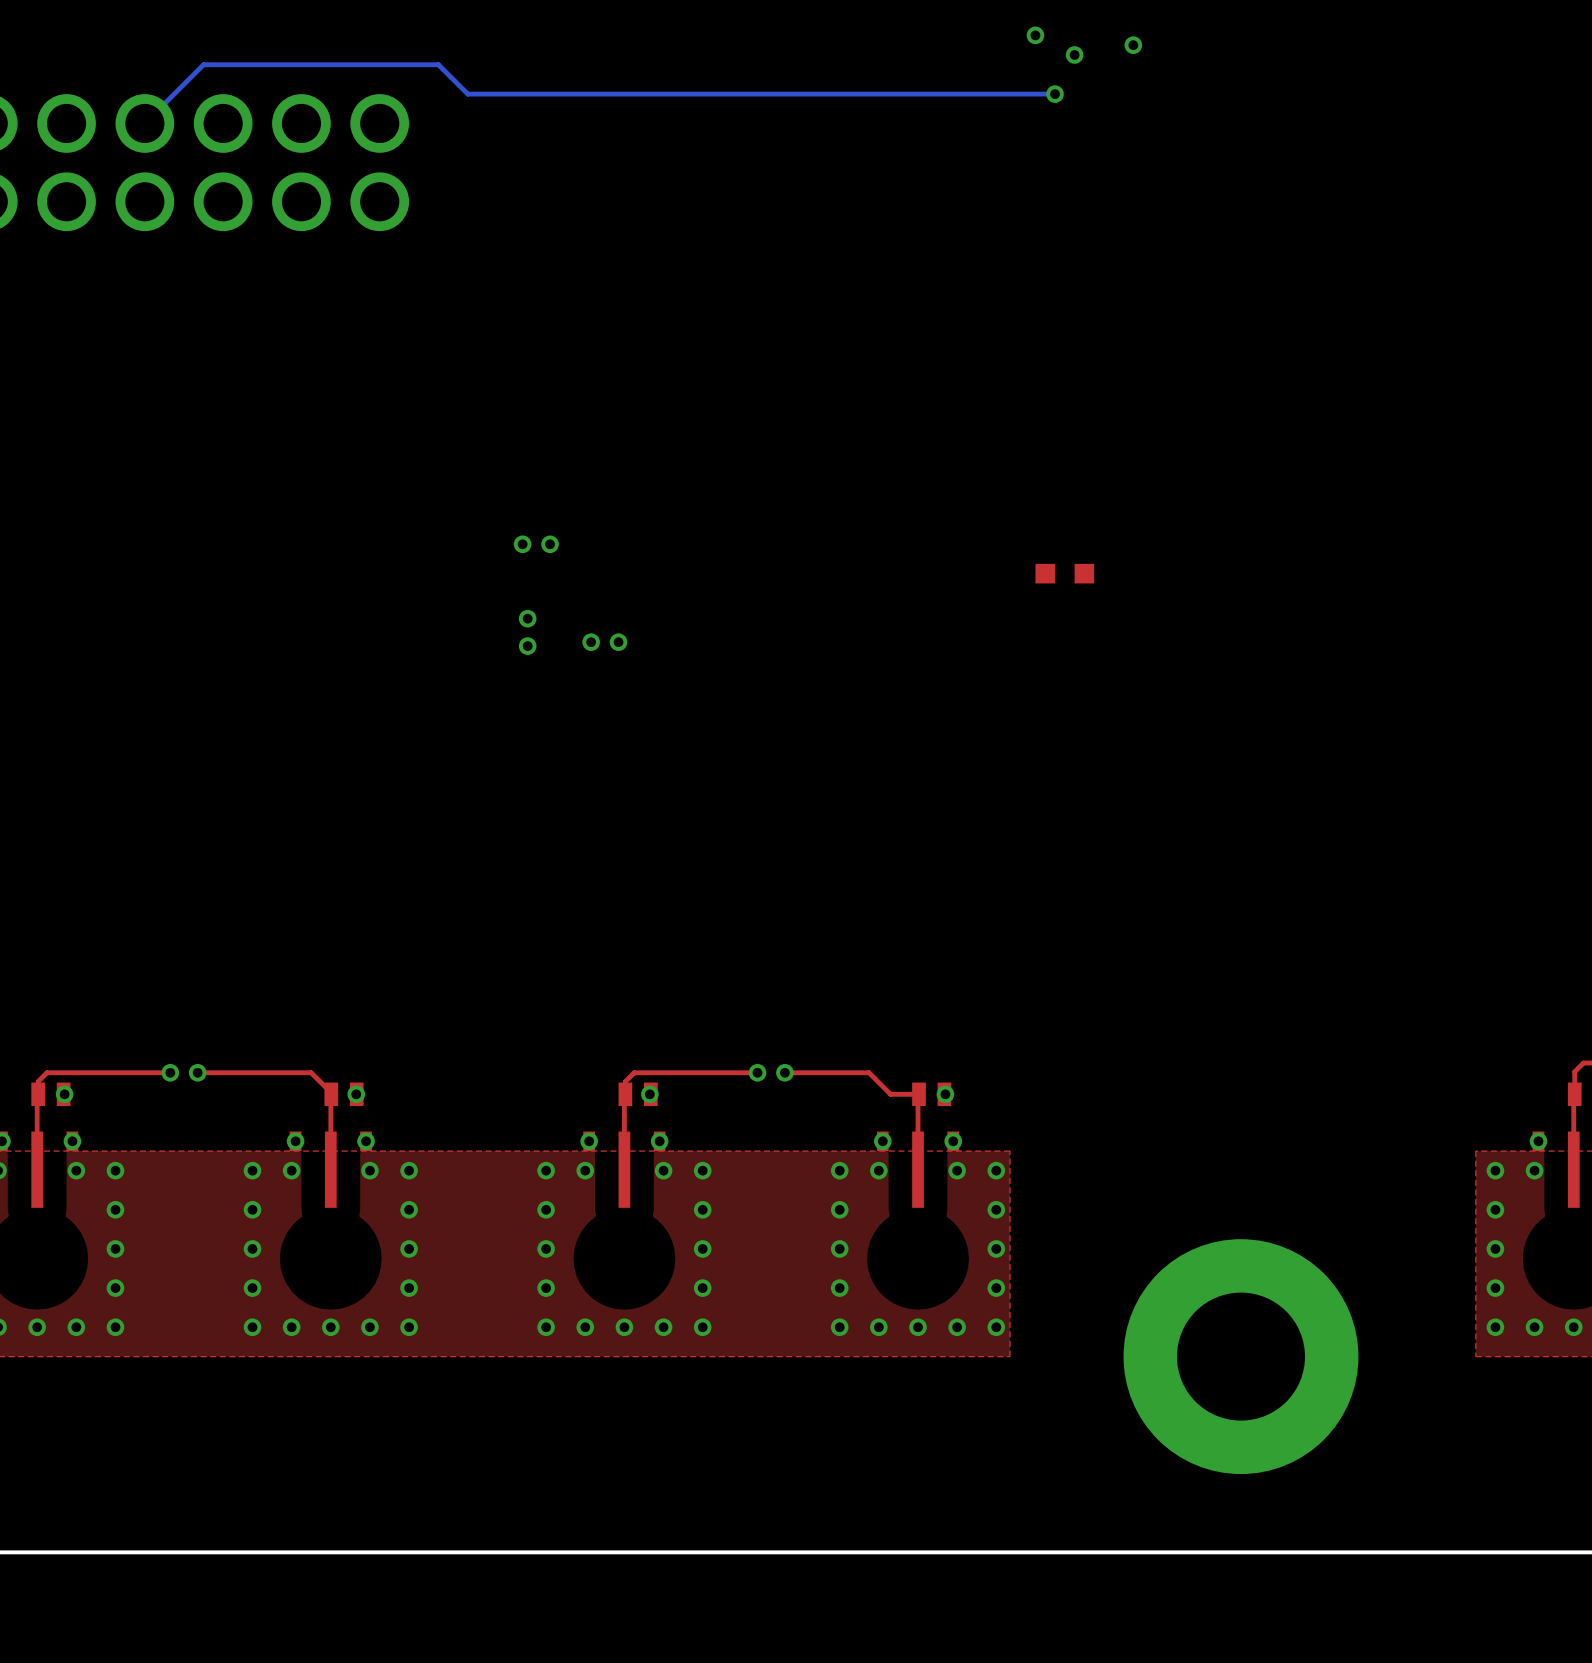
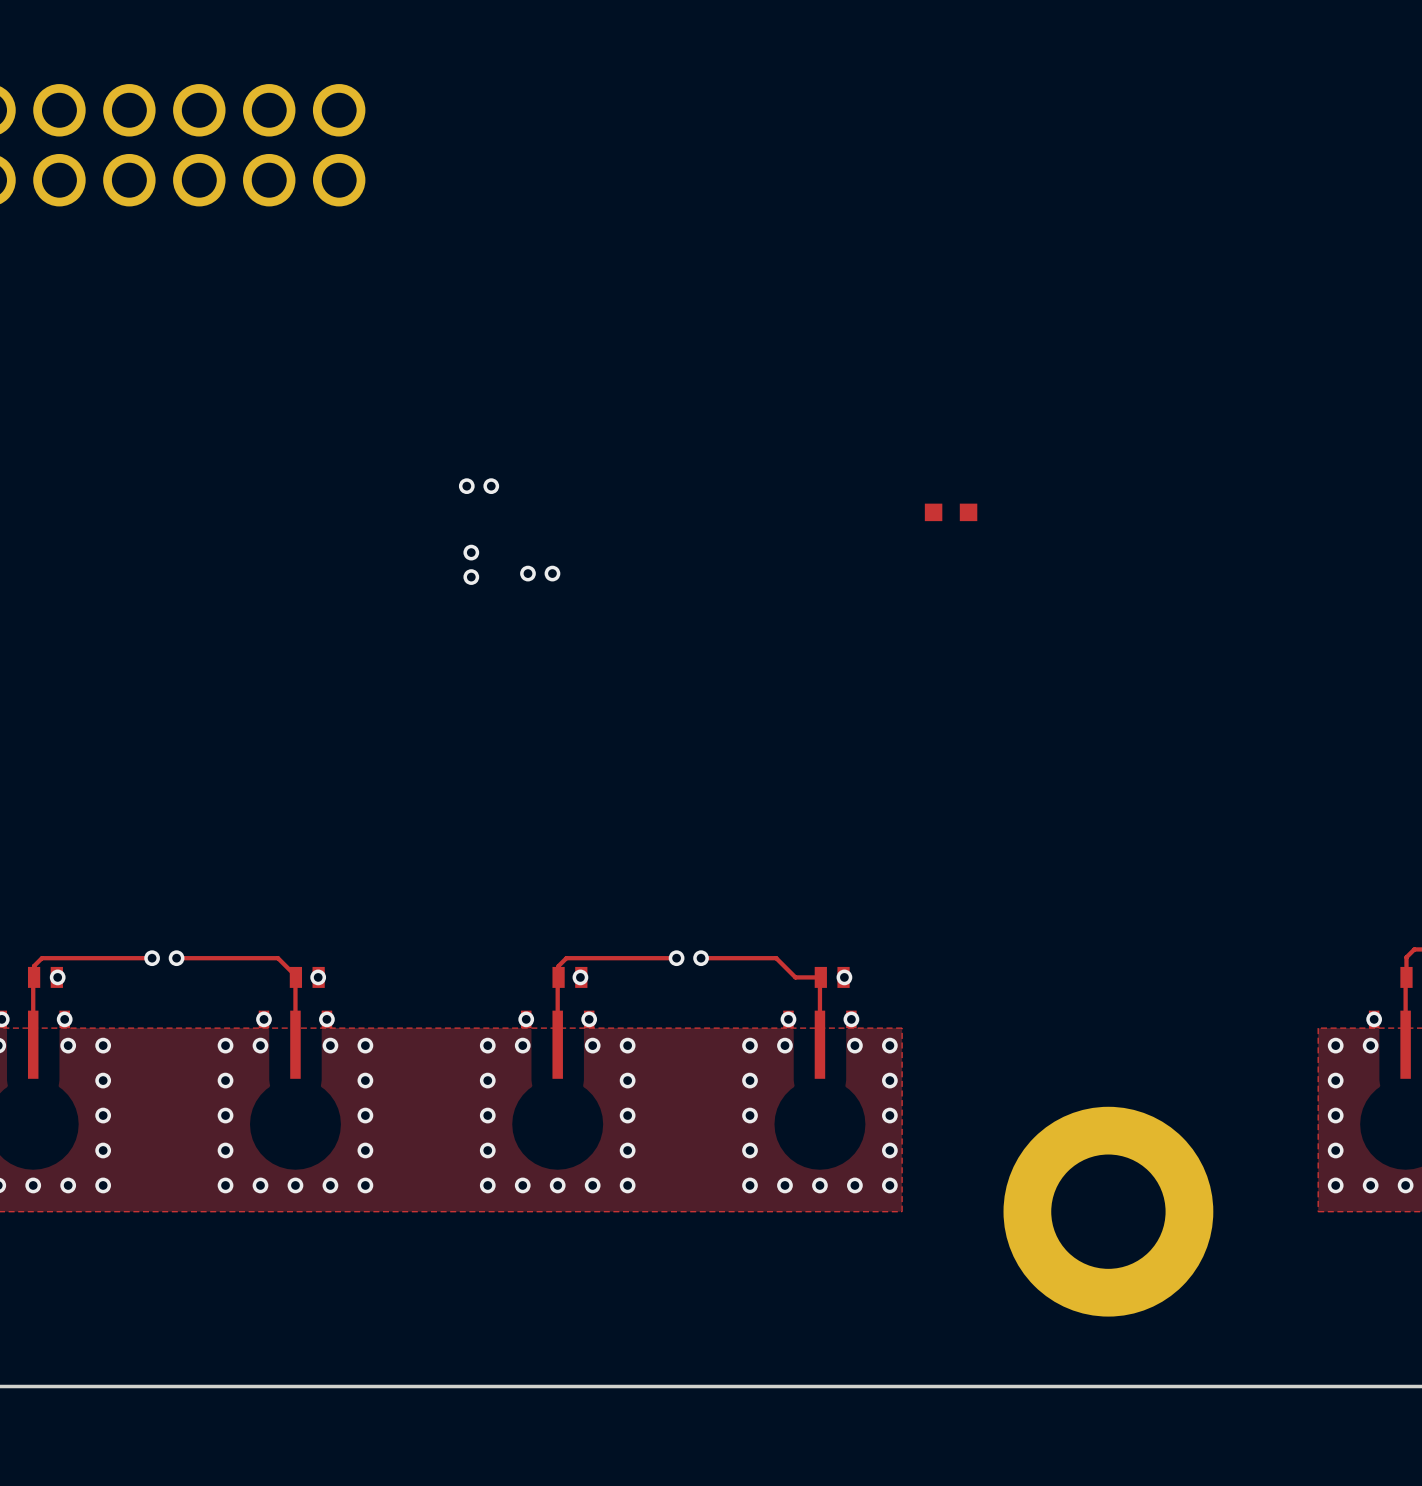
via: (1035, 35) -> none
via: (1133, 45) -> none
via: (1074, 54) -> none
bottom track: (1055, 94) (467, 94) (438, 64) (203, 64) (144, 123) -> none
via: (1055, 94) -> none

